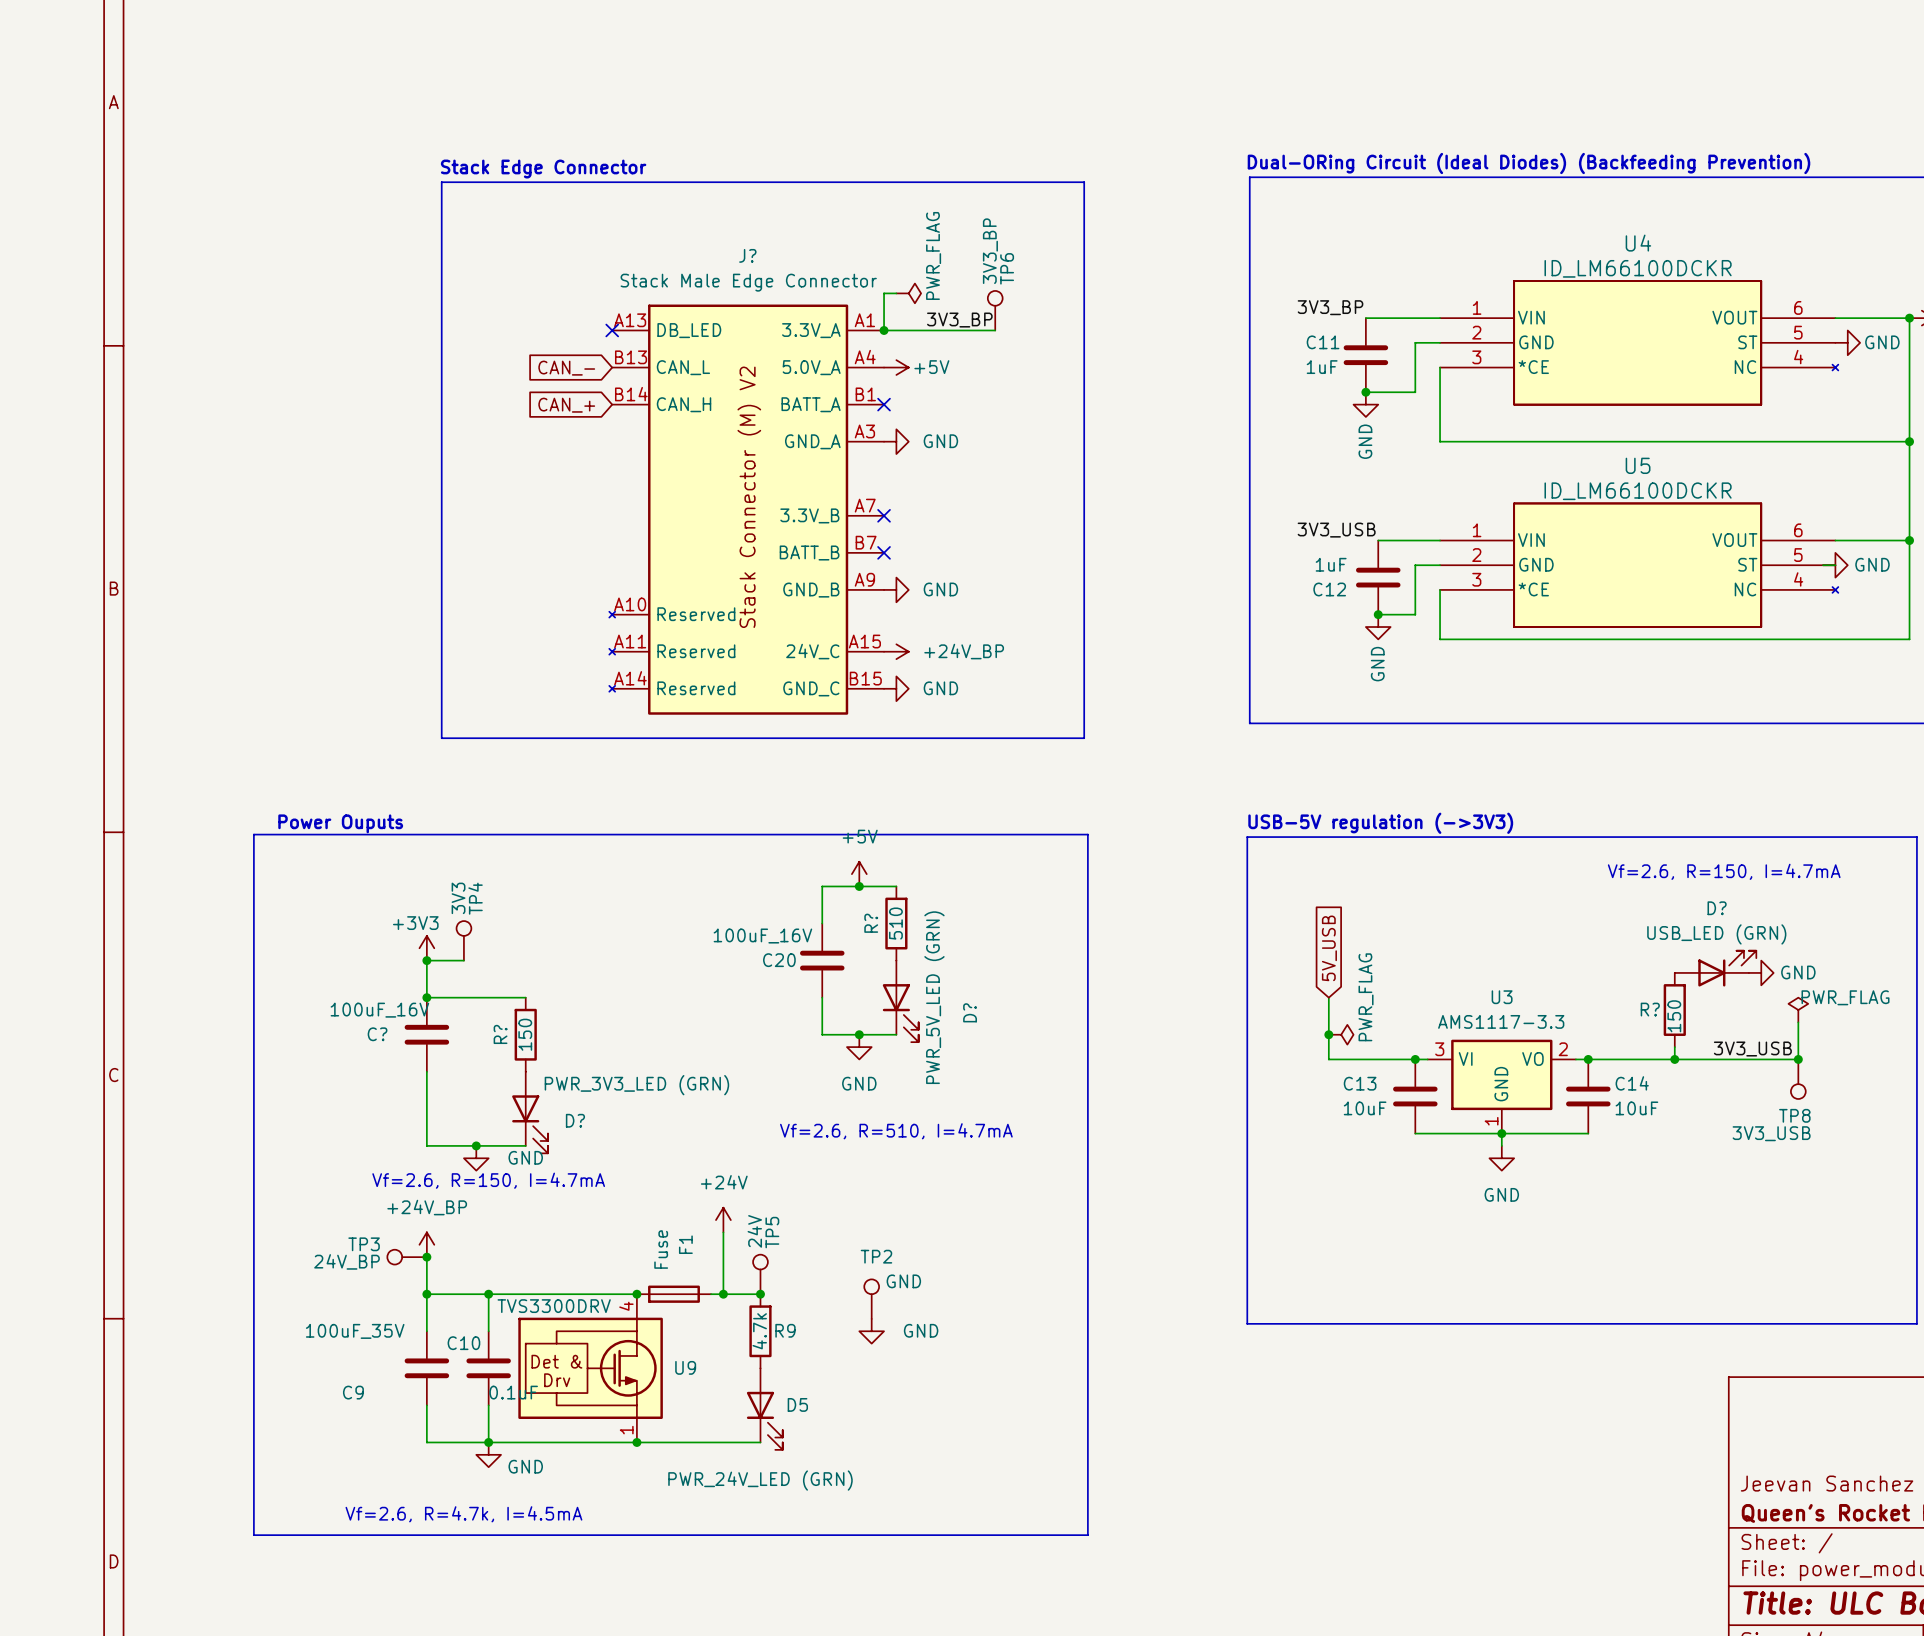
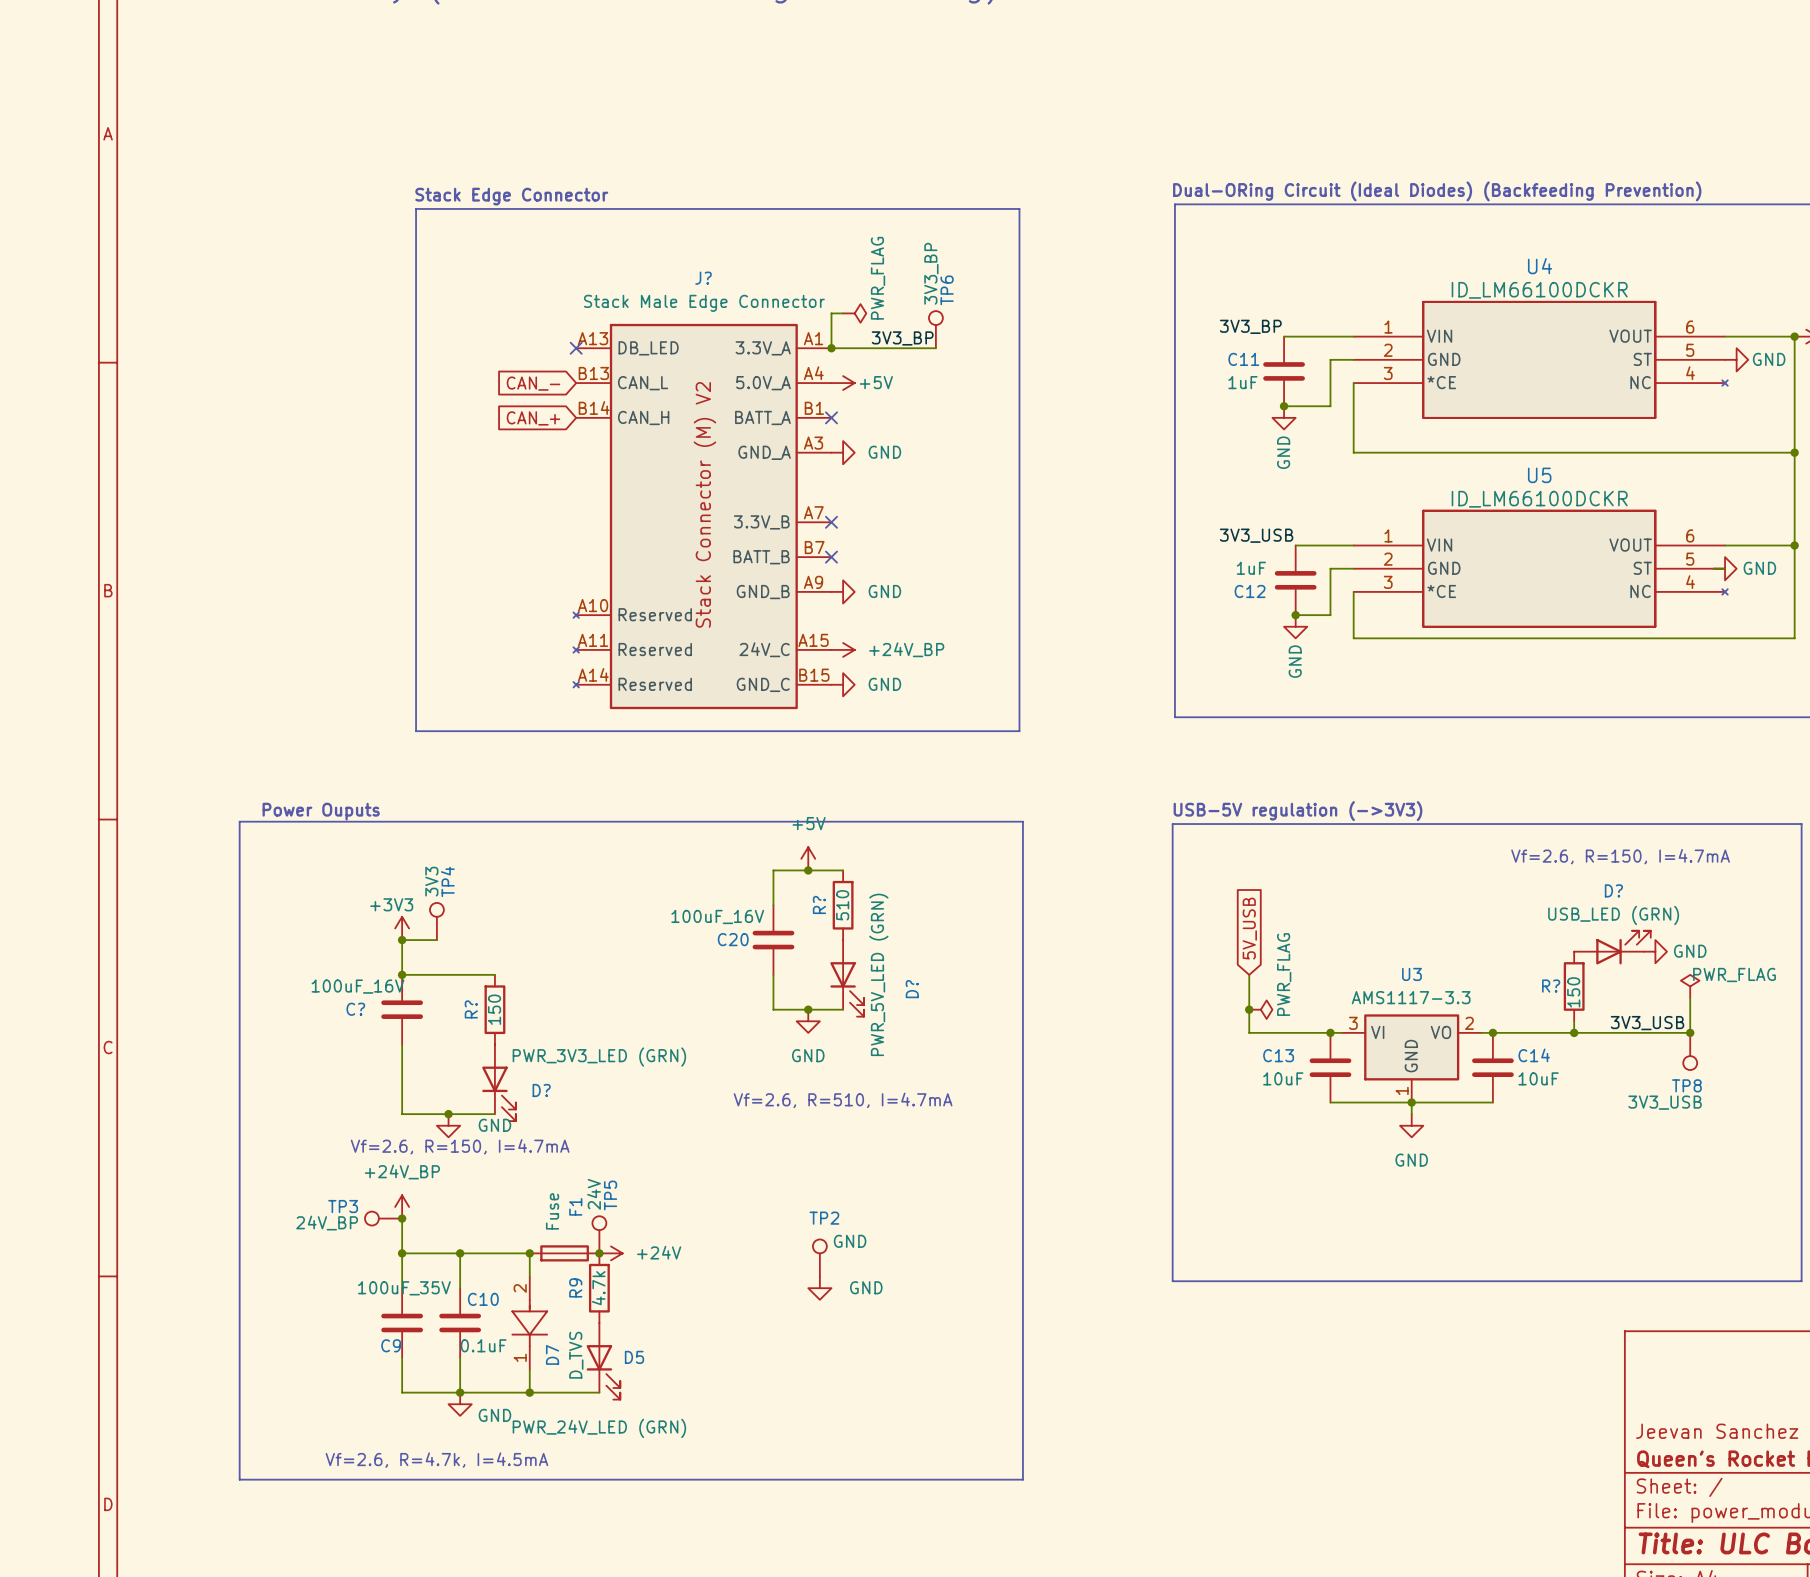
power symbol rotation: 0° (723, 1220) -> 90° clockwise (611, 1253)
power symbol position: +24V (723, 1220) -> +24V (611, 1253)
wire: (723, 1232) (723, 1294) -> none
TP5 position: (760, 1274) -> (599, 1234)
junction: none -> (529, 1253)
F1 position: (673, 1294) -> (564, 1253)
wire: (711, 1294) (760, 1294) -> none
junction: (723, 1294) -> none
junction: (760, 1294) -> none
R9 name rotation: 0° (785, 1330) -> 90° counterclockwise (575, 1287)
R9 name position: R9 (785, 1330) -> R9 (575, 1287)
C9 value position: 100uF_35V (355, 1331) -> 100uF_35V (404, 1288)
R9 position: (760, 1331) -> (599, 1288)
C10 name position: C10 (463, 1343) -> C10 (483, 1299)
D7: none -> D_TVS (529, 1323)
U9: TVS3300DRV (590, 1368) -> none
C9 name position: C9 (353, 1392) -> C9 (391, 1345)
D5 position: (764, 1409) -> (603, 1361)
wire: none -> (529, 1369) (529, 1392)
junction: none -> (529, 1392)
wire: (636, 1442) (760, 1442) -> none
junction: (636, 1442) -> none

